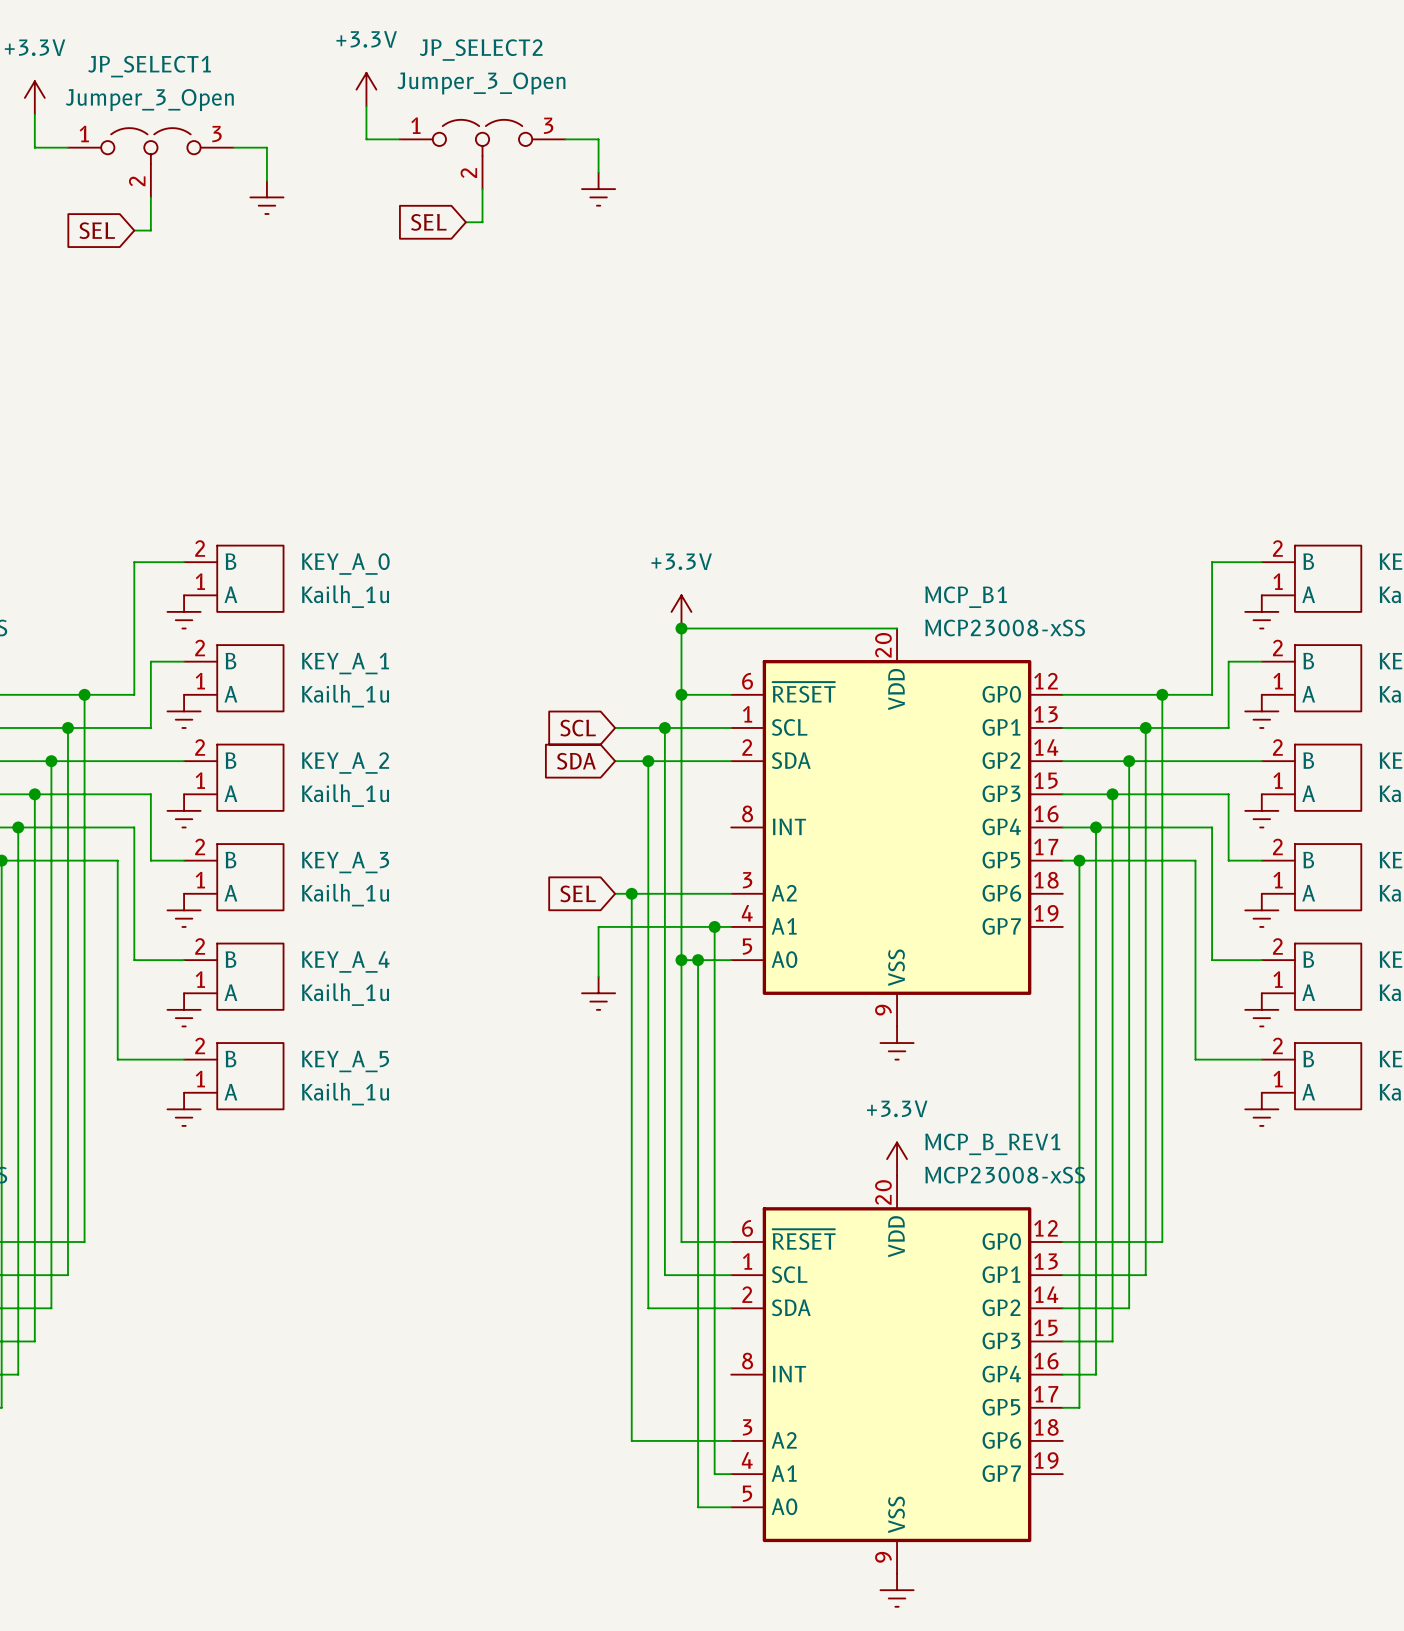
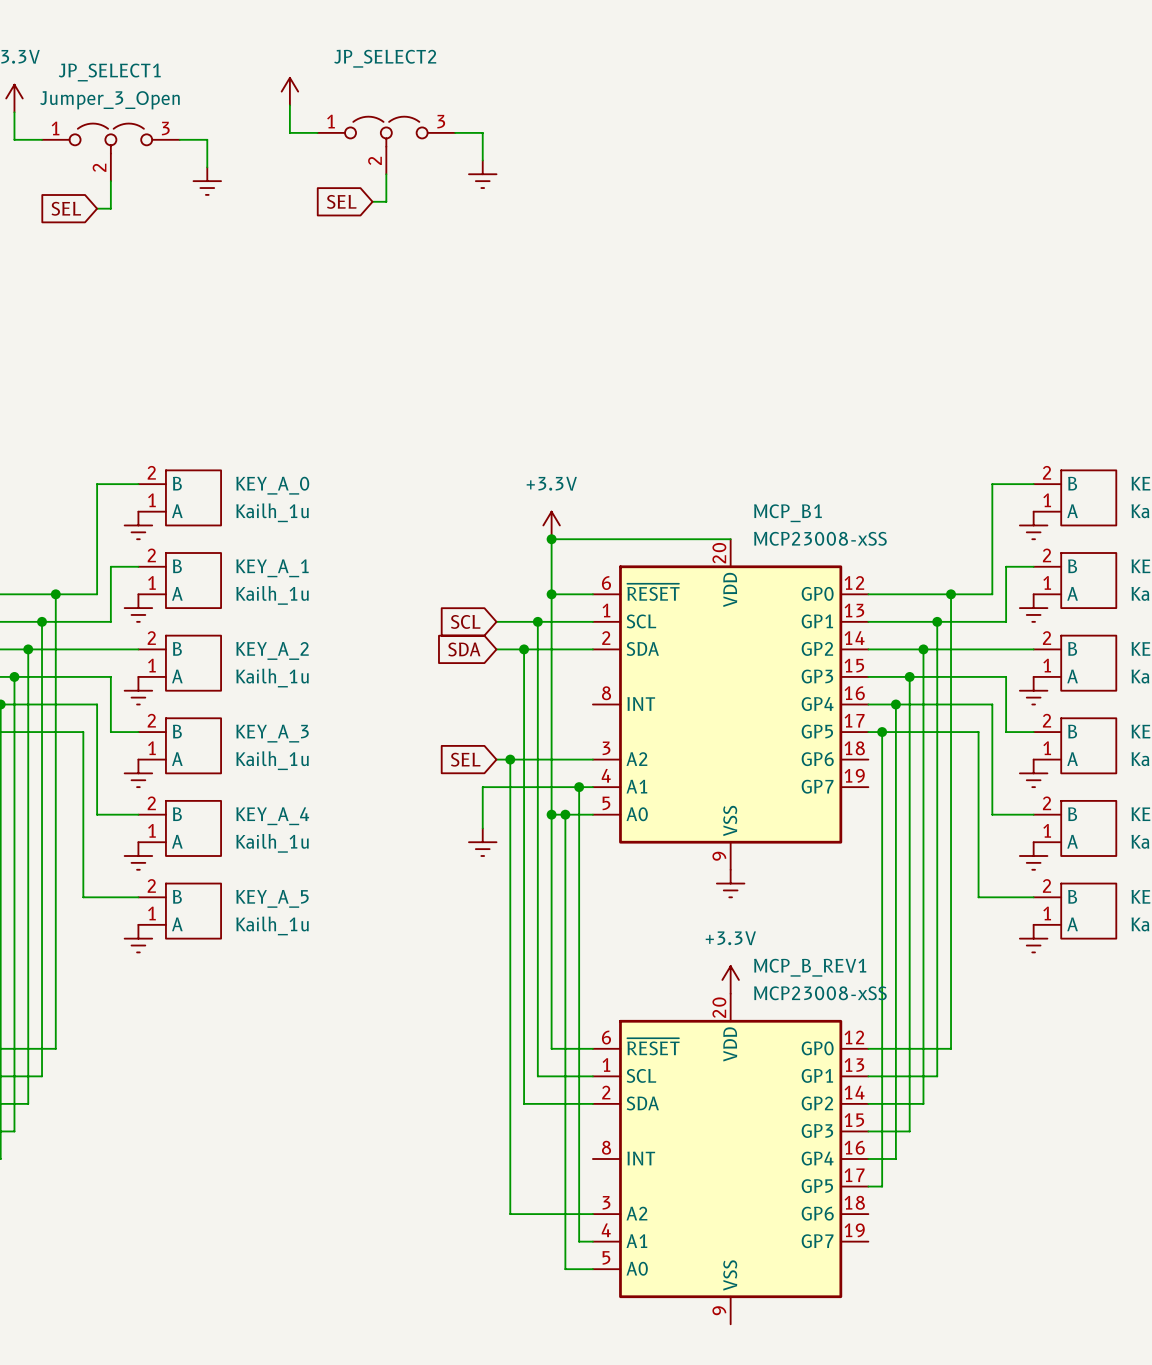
power symbol text: +3.3V (366, 39) -> none
JP_SELECT2 value: Jumper_3_Open (481, 83) -> none
power symbol: (897, 1590) -> none

